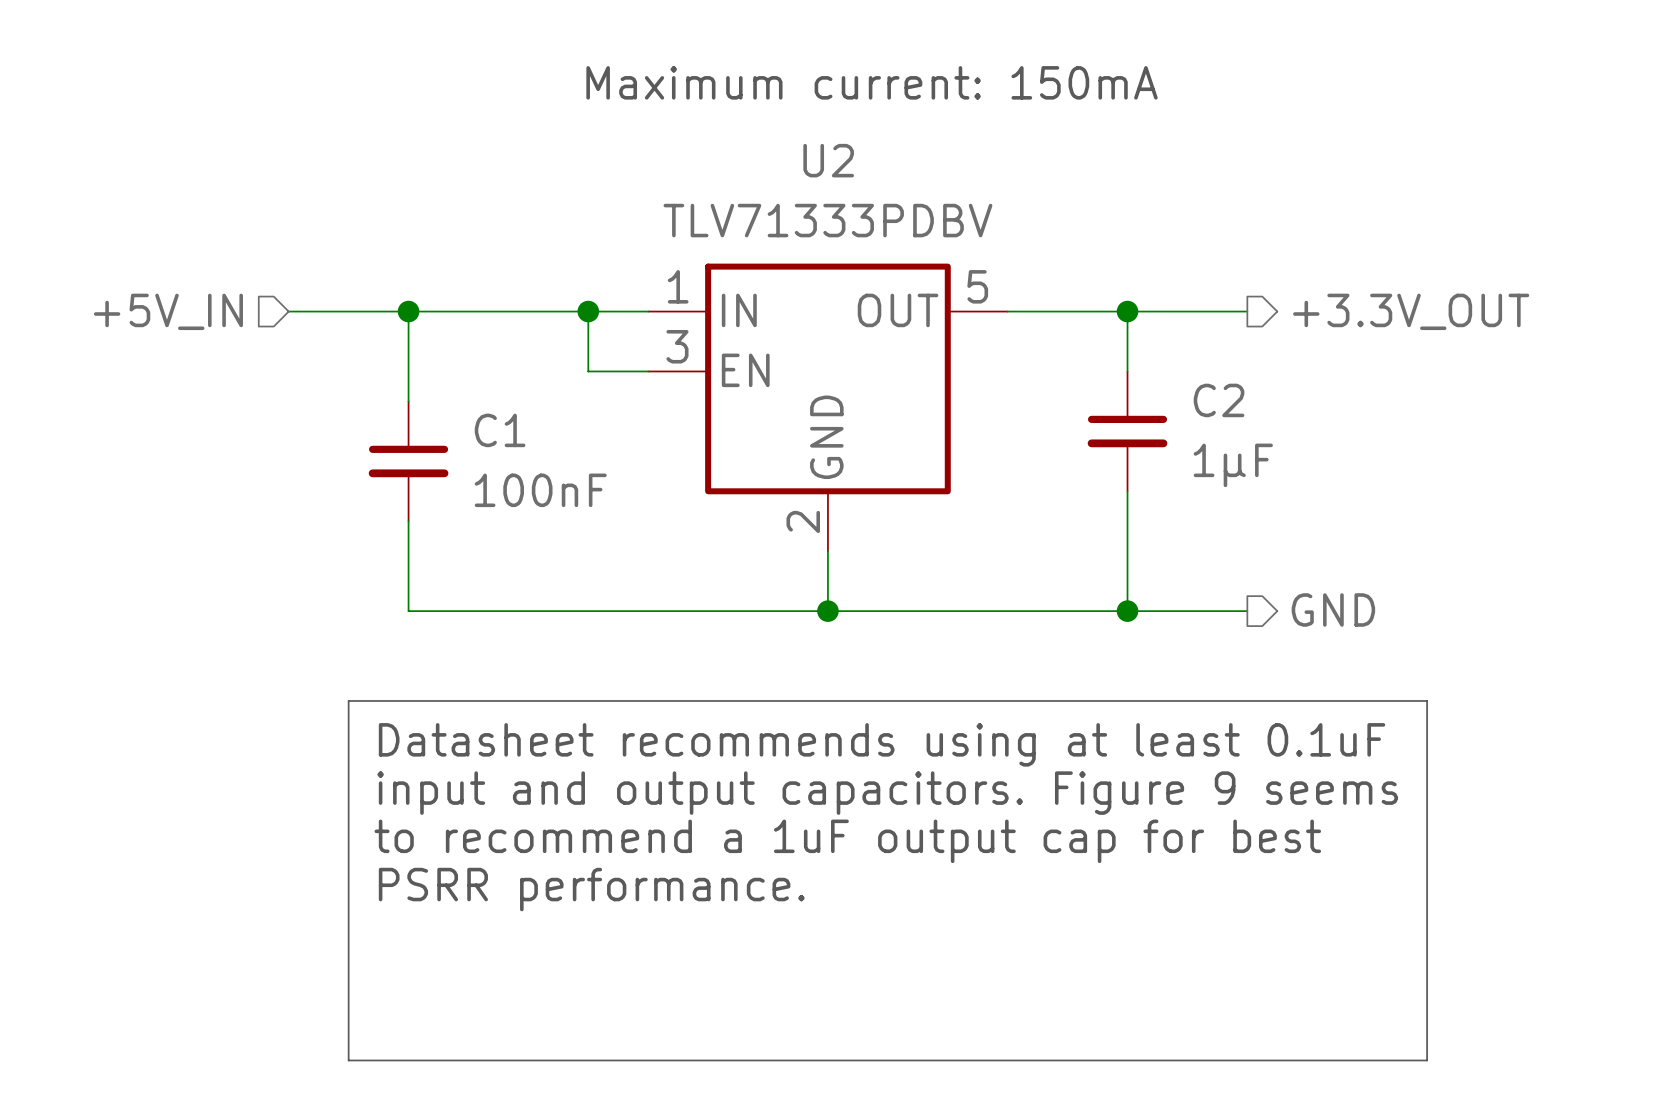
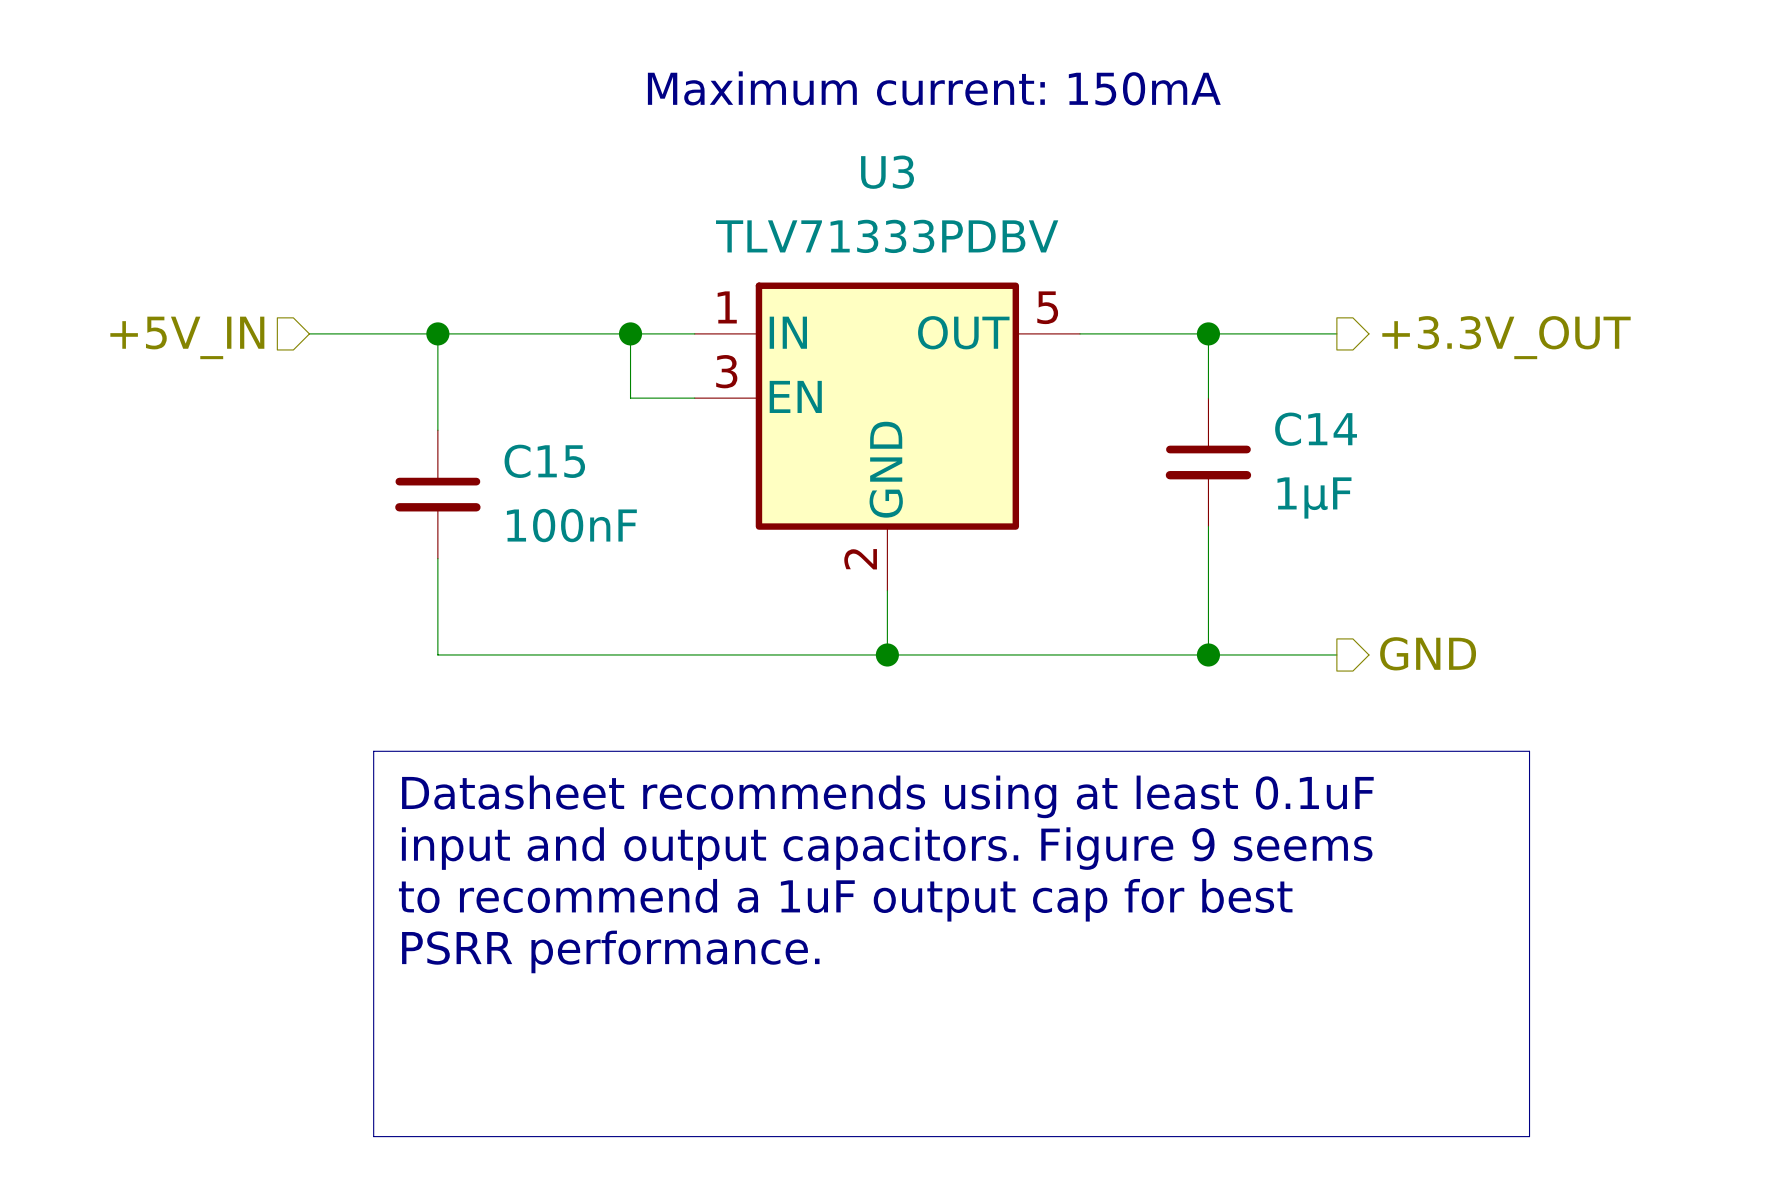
U2 name: U2 (828, 160) -> U3 (887, 172)
C2 name: C2 (1219, 400) -> C14 (1316, 429)
C1 name: C1 (500, 430) -> C15 (544, 461)

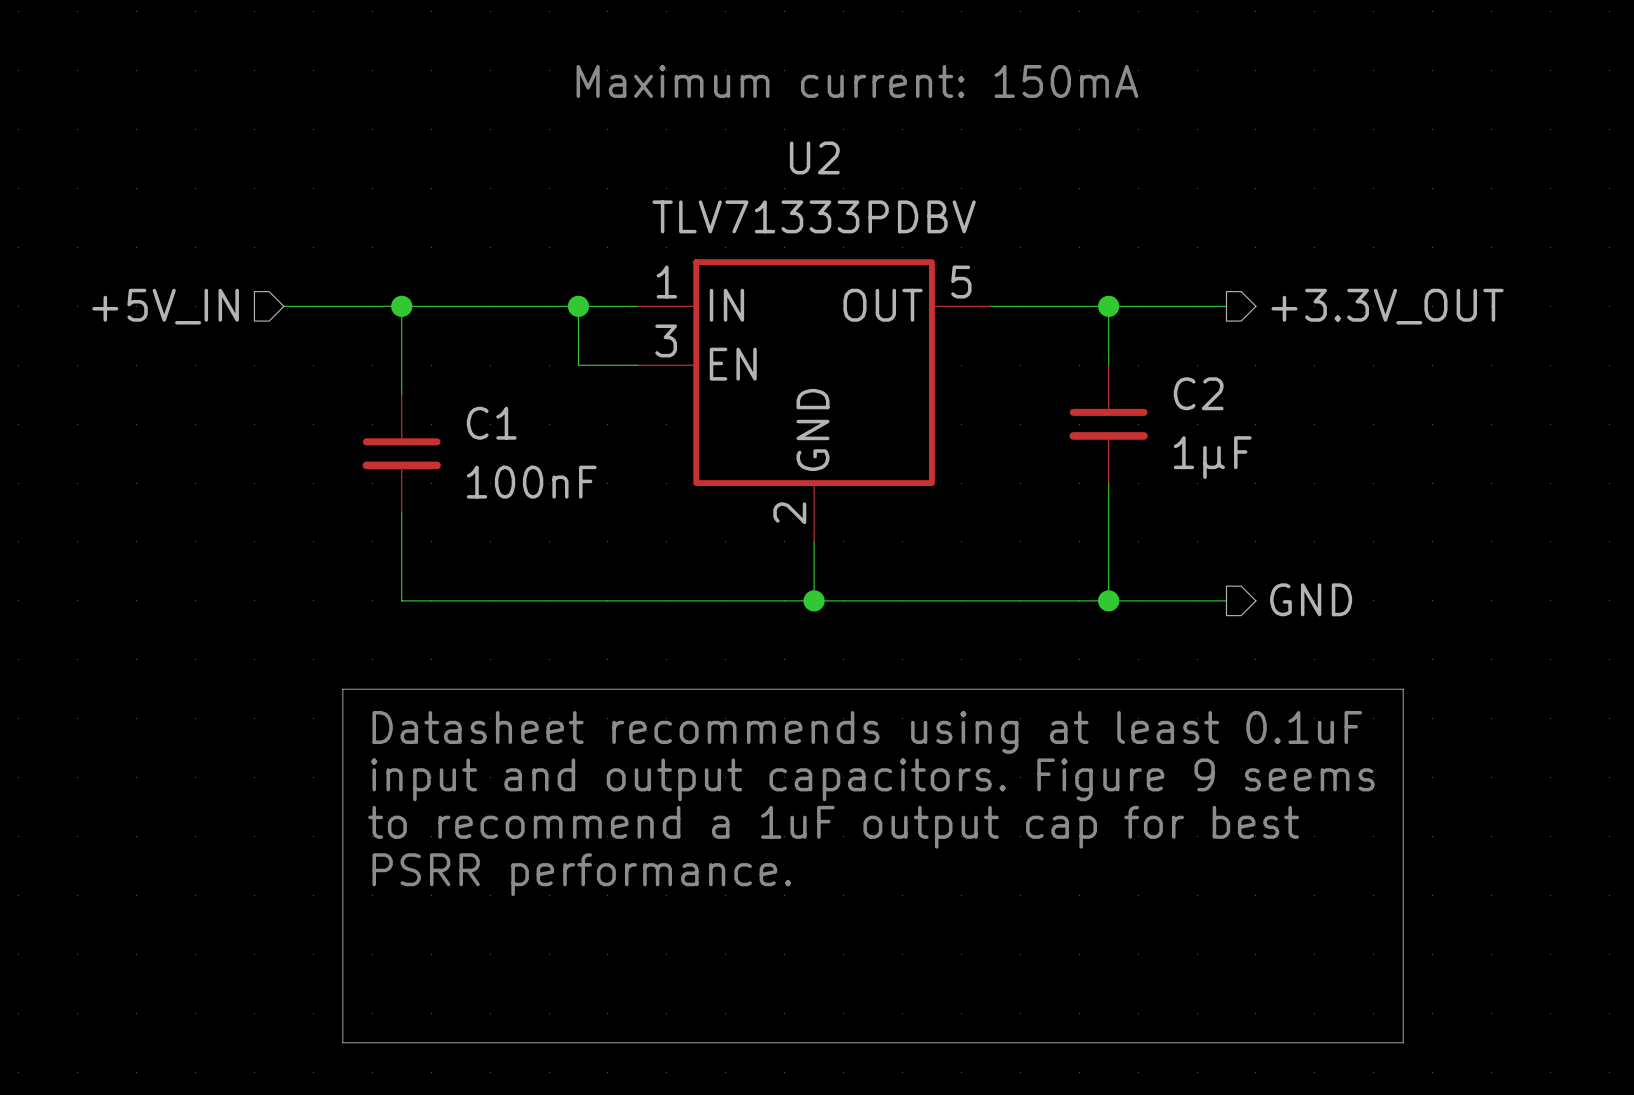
U3 name: U3 (887, 172) -> U2 (814, 157)
C14 name: C14 (1316, 429) -> C2 (1198, 393)
C15 name: C15 (544, 461) -> C1 (491, 423)

